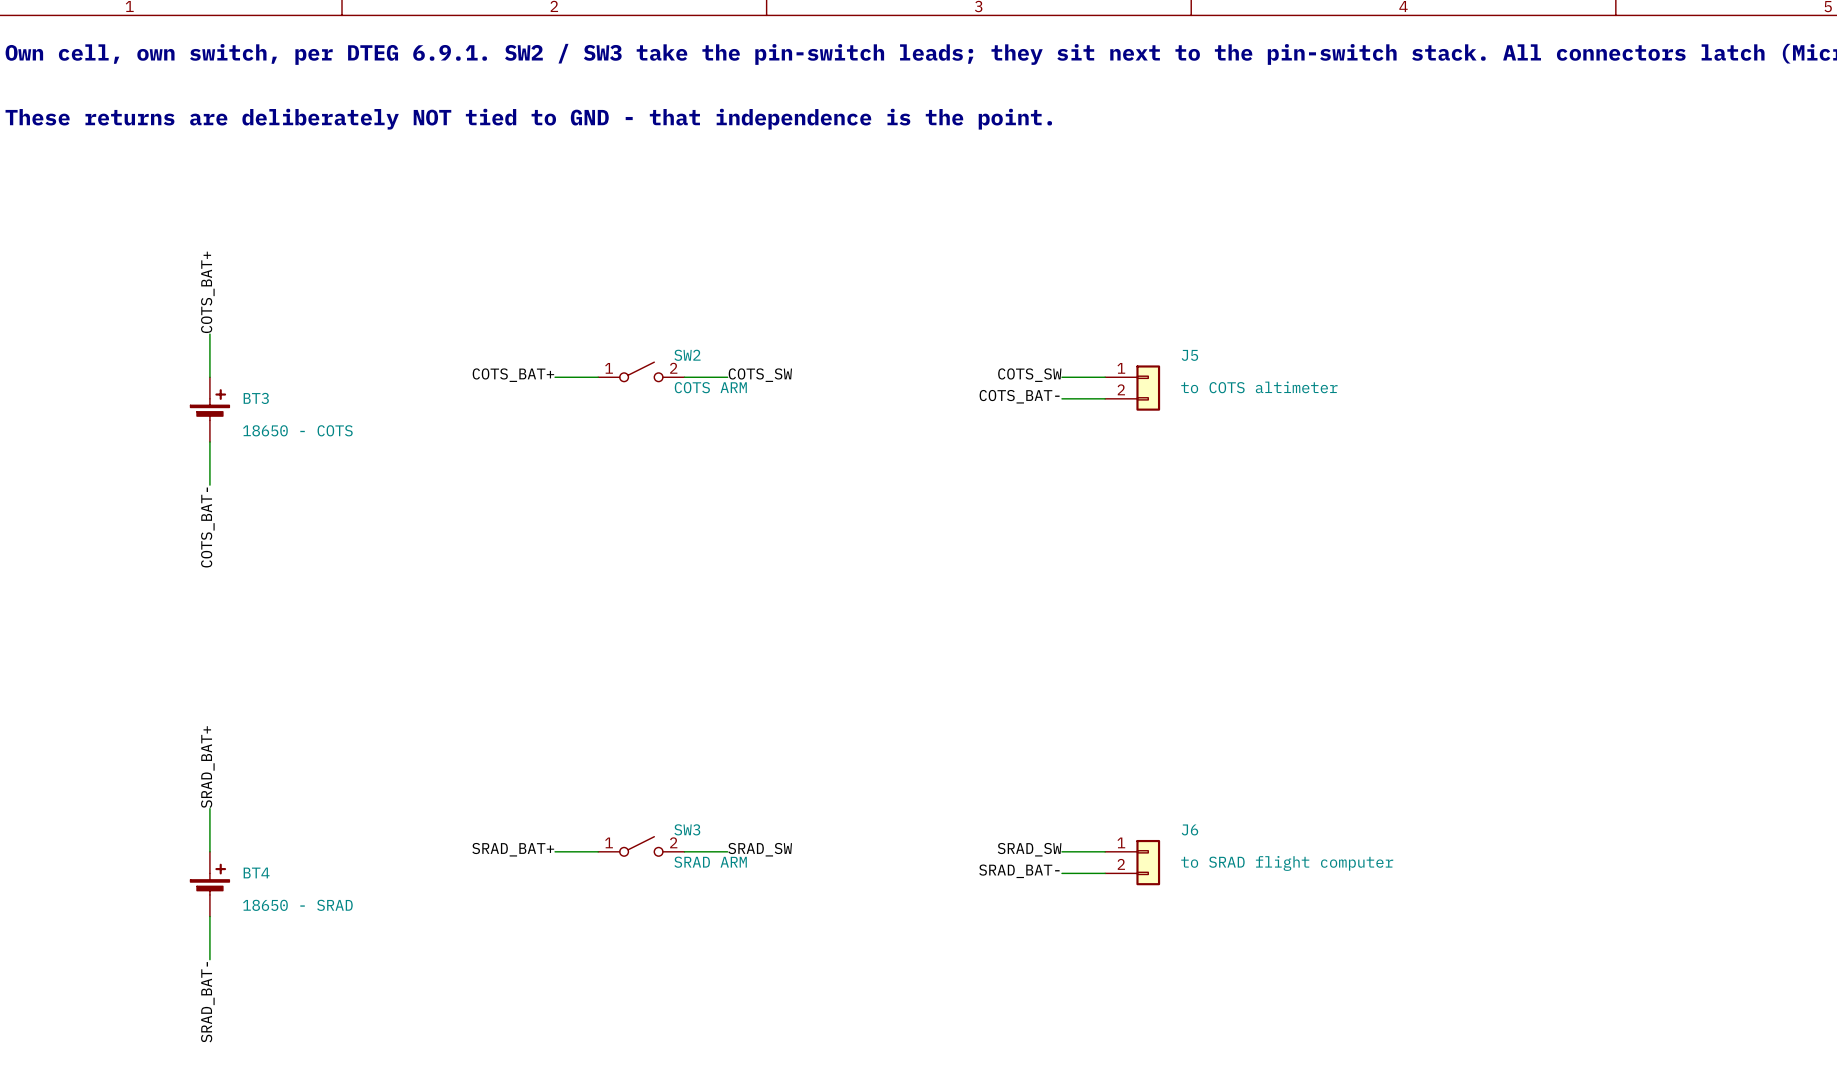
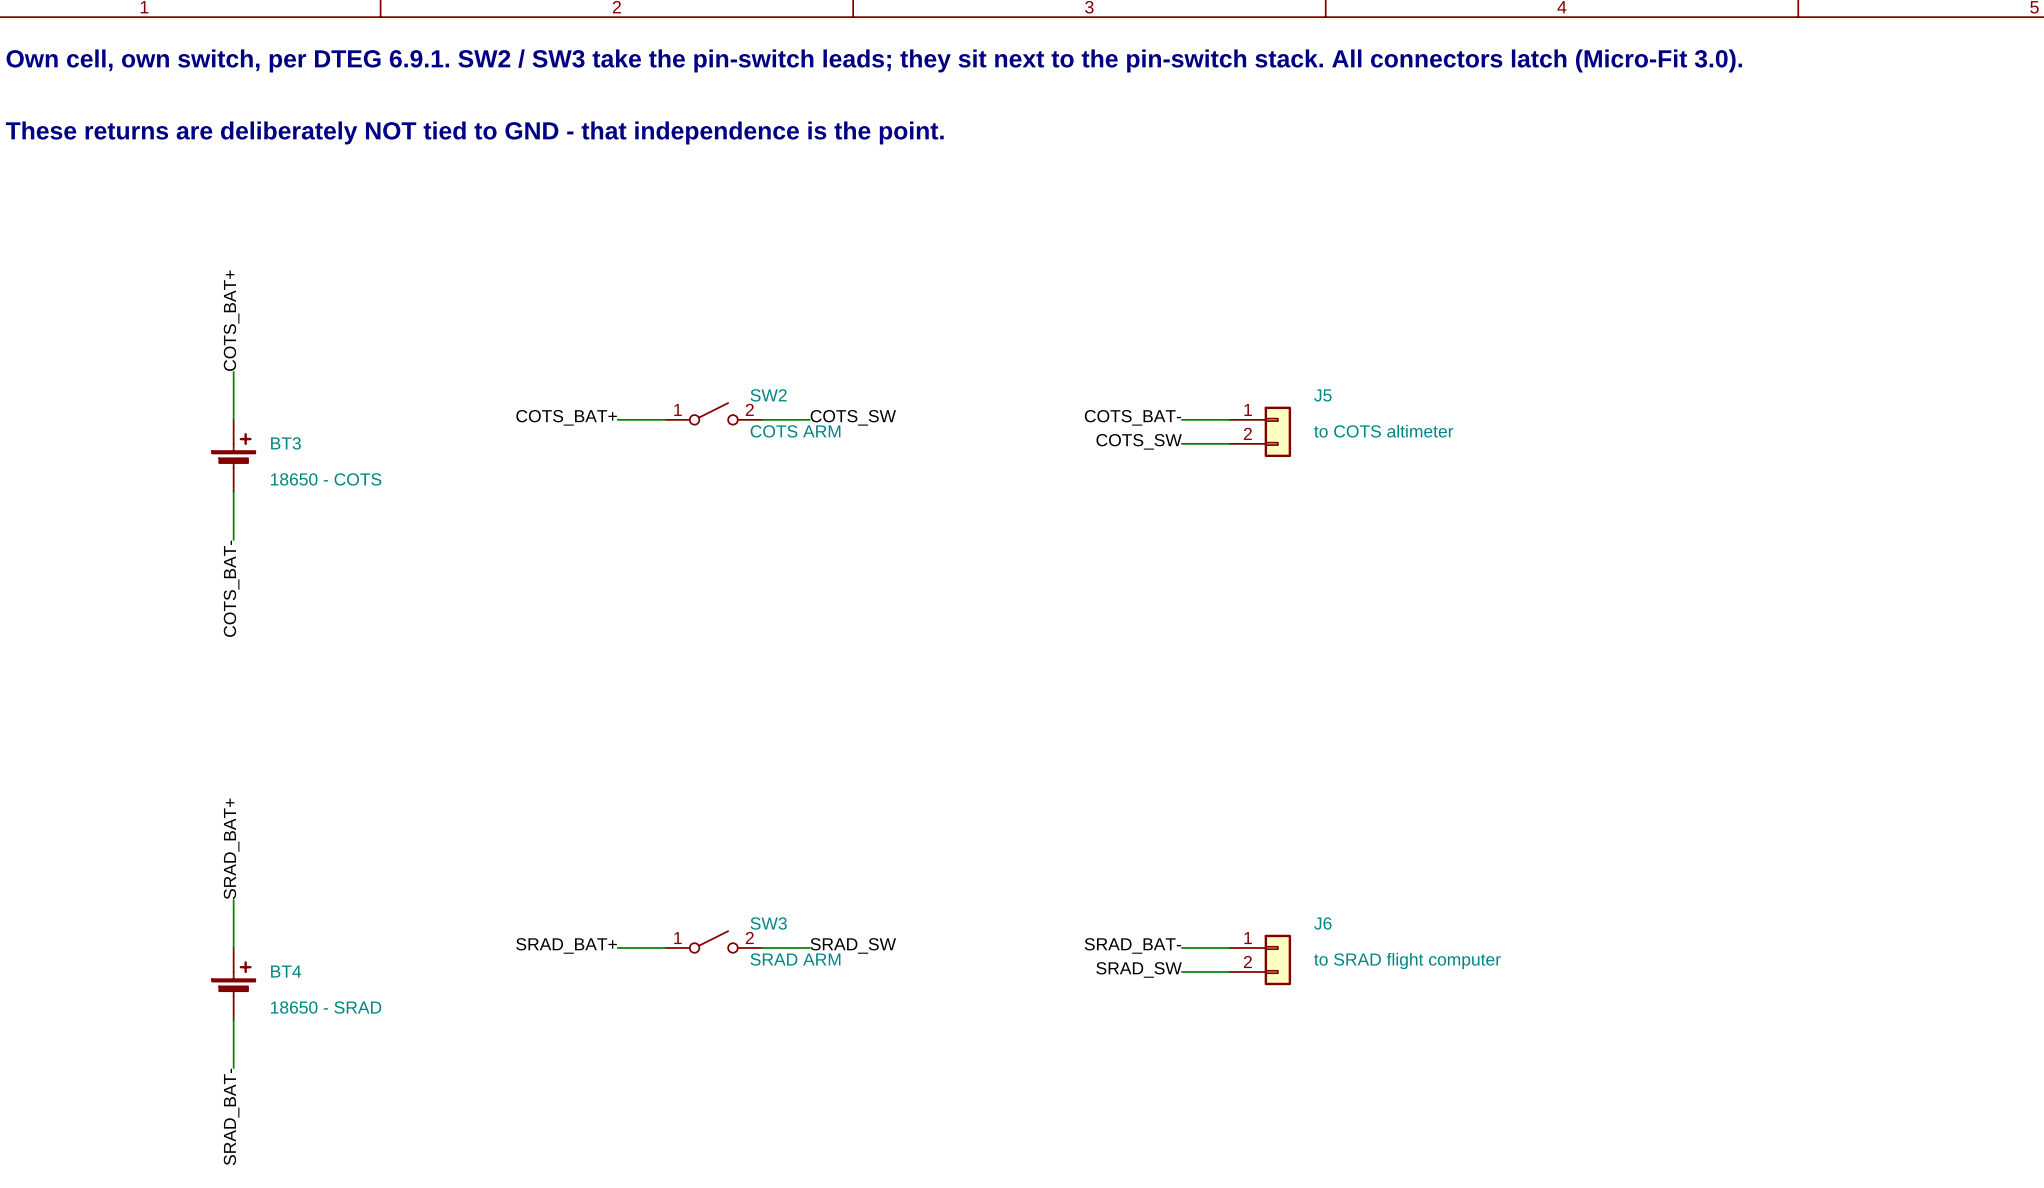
label: COTS_SW (1029, 375) -> COTS_BAT- (1132, 417)
label: COTS_BAT- (1019, 396) -> COTS_SW (1139, 441)
label: SRAD_SW (1029, 849) -> SRAD_BAT- (1132, 945)
label: SRAD_BAT- (1019, 871) -> SRAD_SW (1139, 969)

